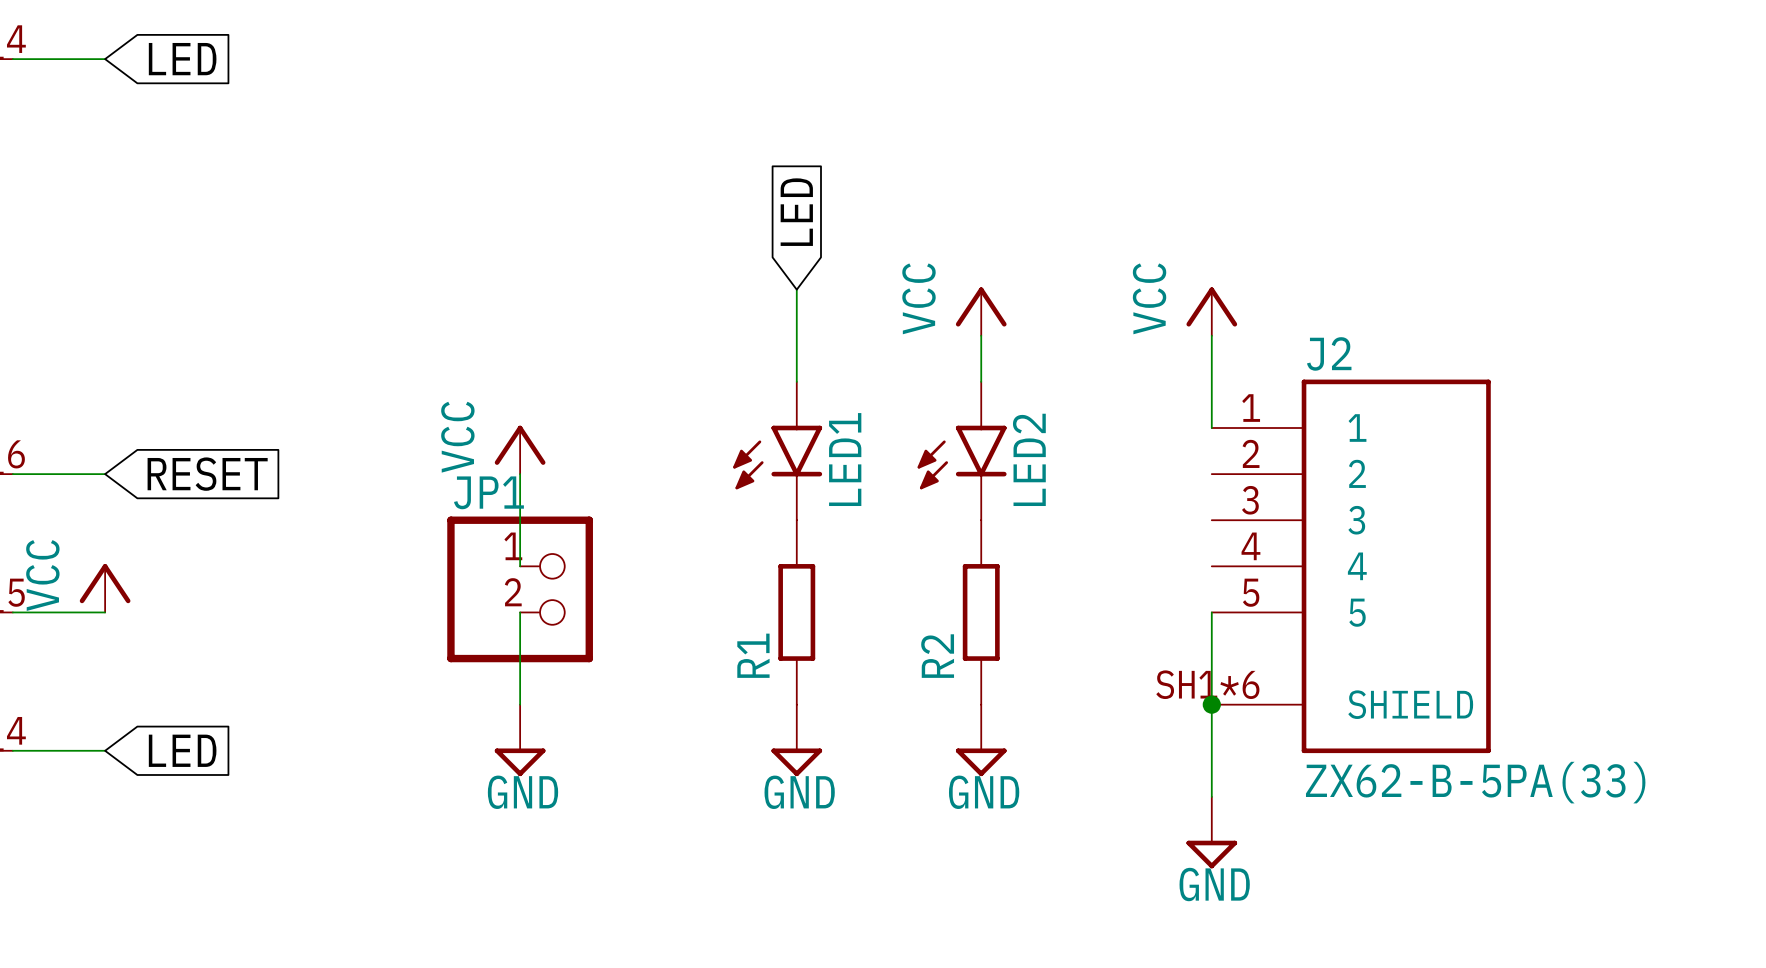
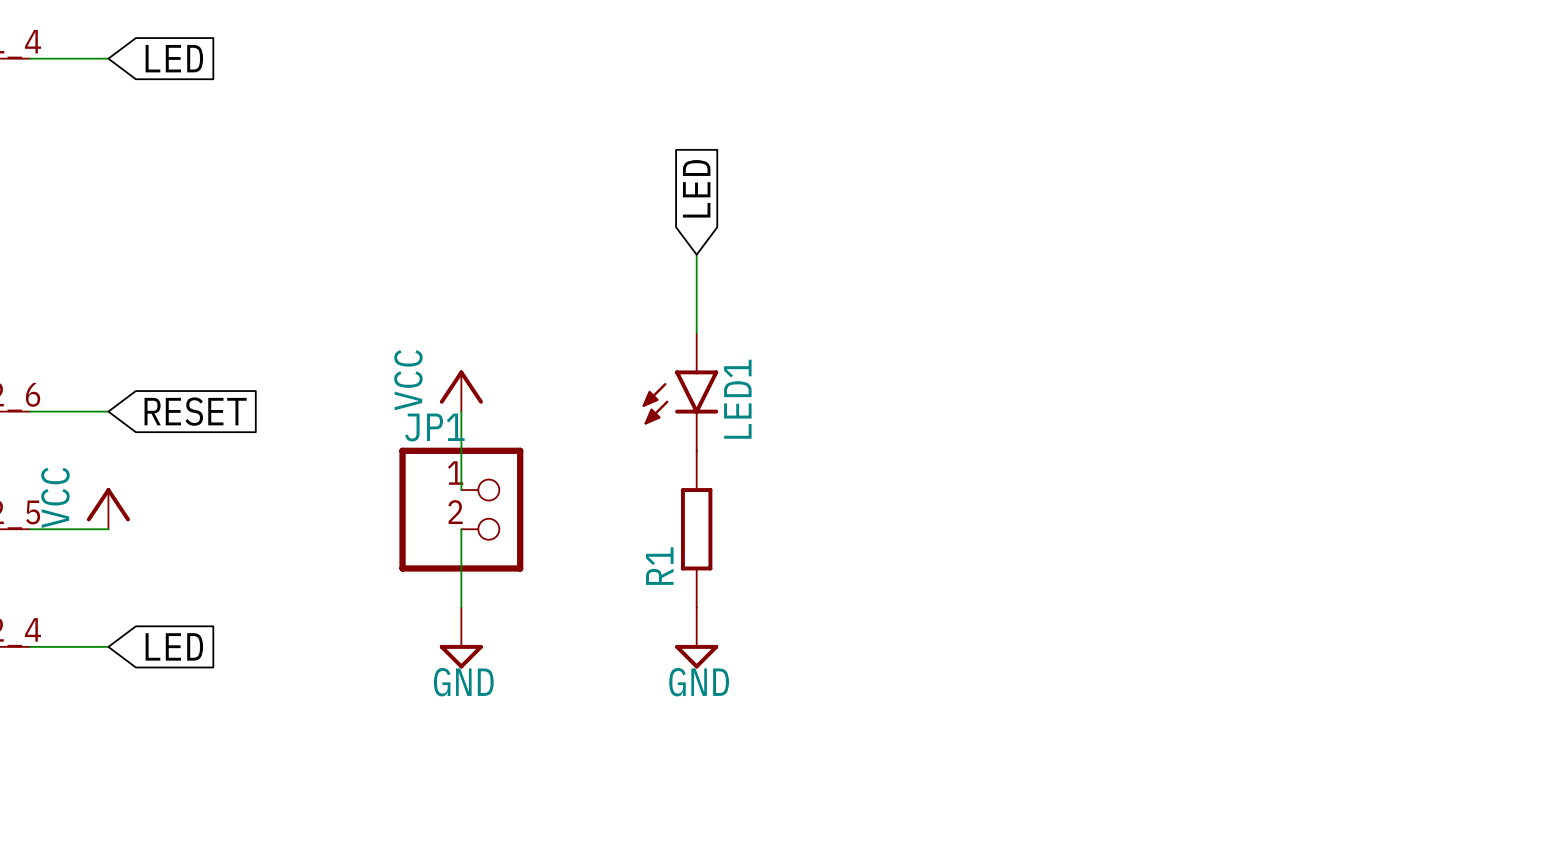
power symbol: VCC (981, 311) -> none
power symbol: VCC (1211, 311) -> none
wire: (981, 335) (981, 381) -> none
wire: (1211, 335) (1211, 428) -> none
LED2: (962, 451) -> none
J2: ZX62-B-5PA(33) (1351, 566) -> none
R2: (981, 612) -> none
wire: (1211, 612) (1211, 796) -> none
junction: (1211, 704) -> none
power symbol: GND (981, 740) -> none
power symbol: GND (1211, 832) -> none

